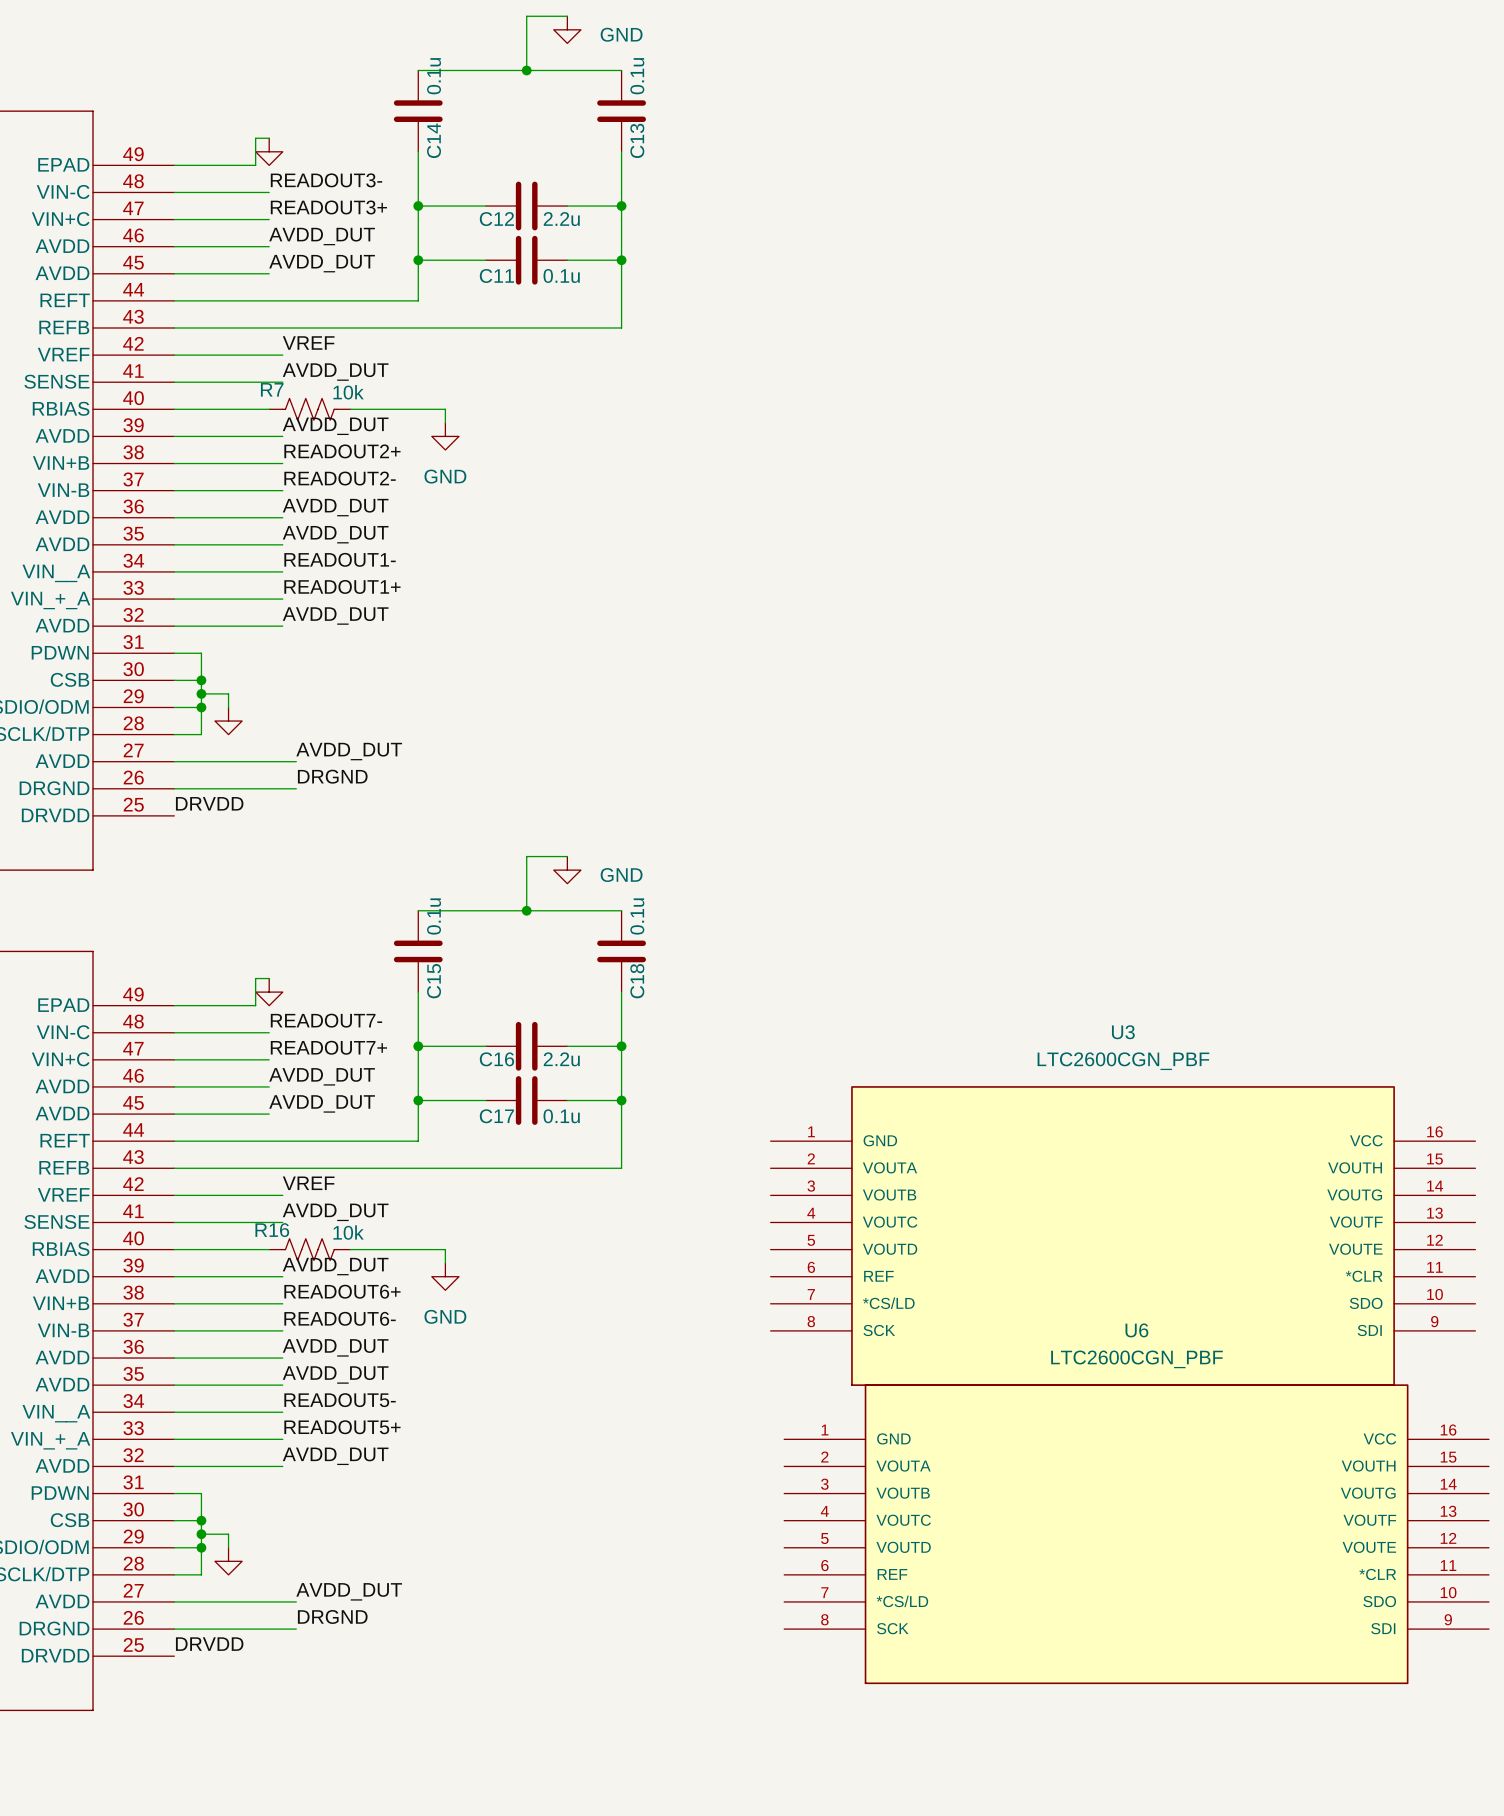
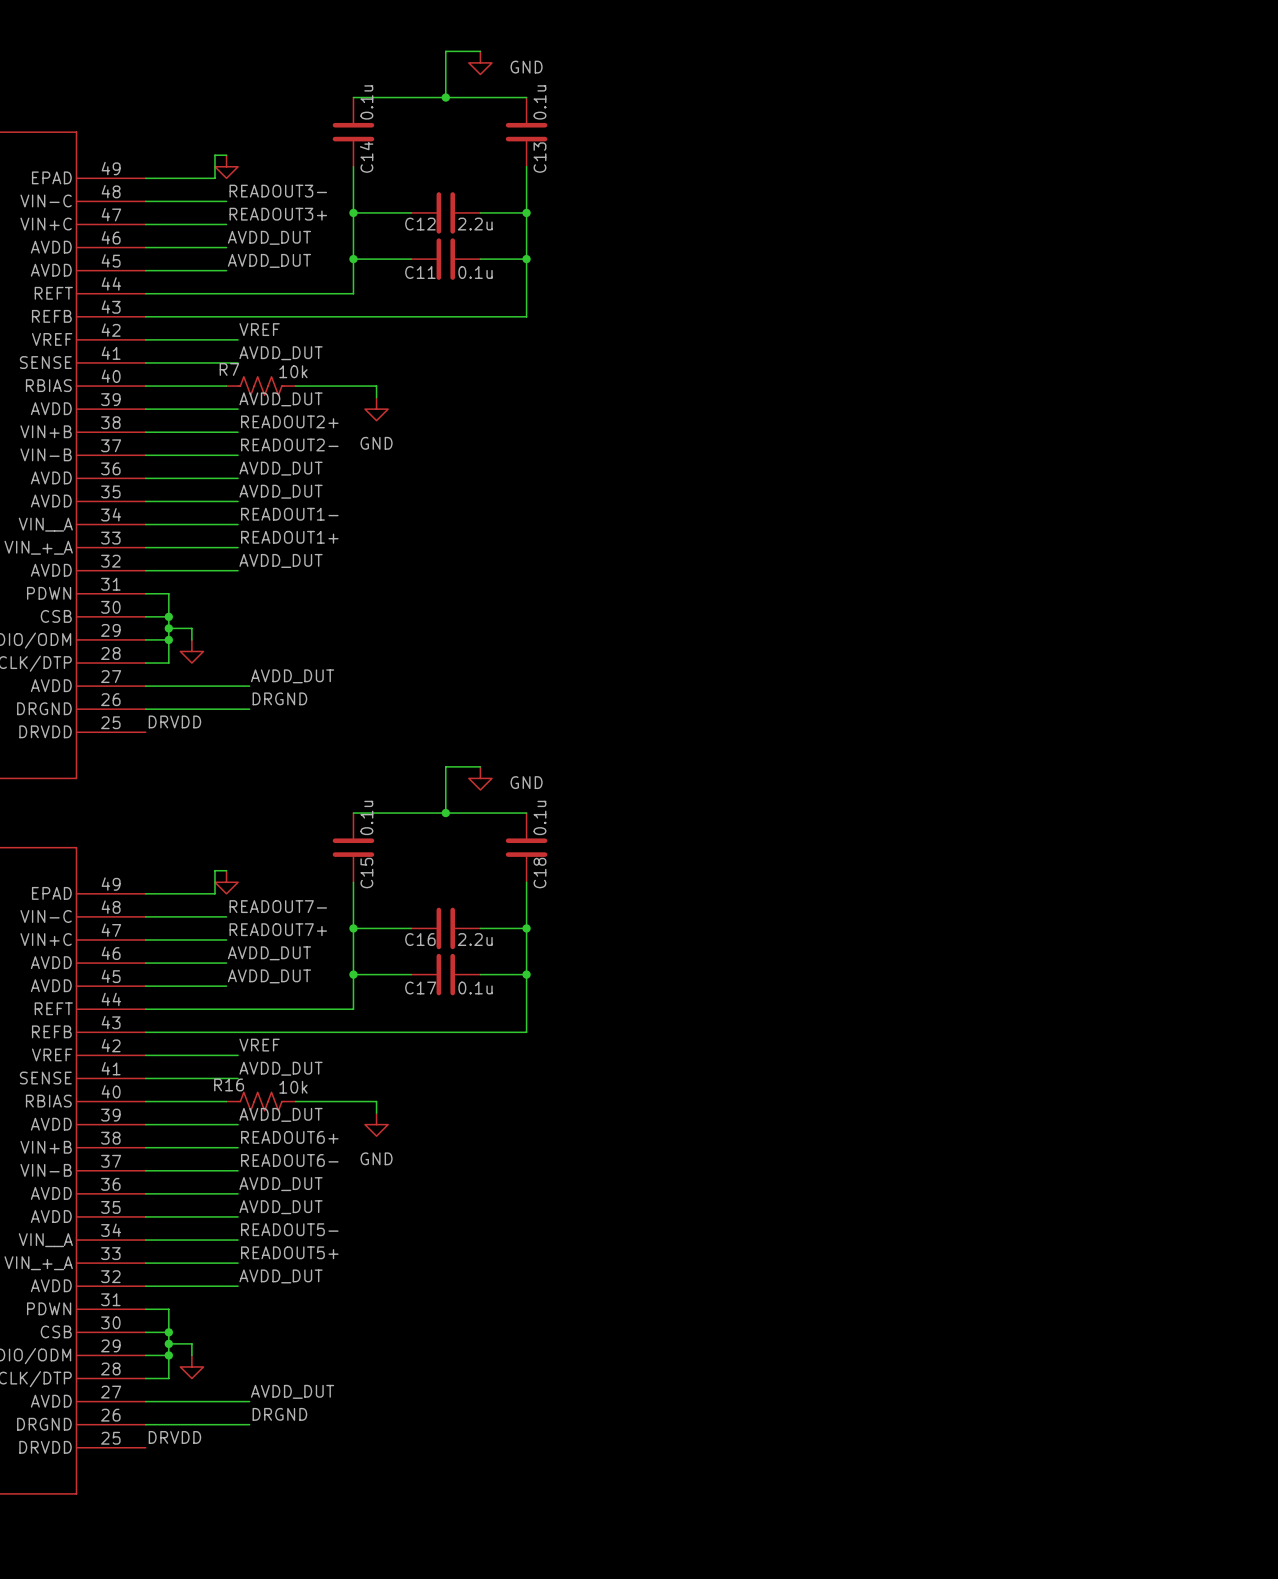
U3: LTC2600CGN_PBF (1123, 1236) -> none
U6: LTC2600CGN_PBF (1136, 1534) -> none

